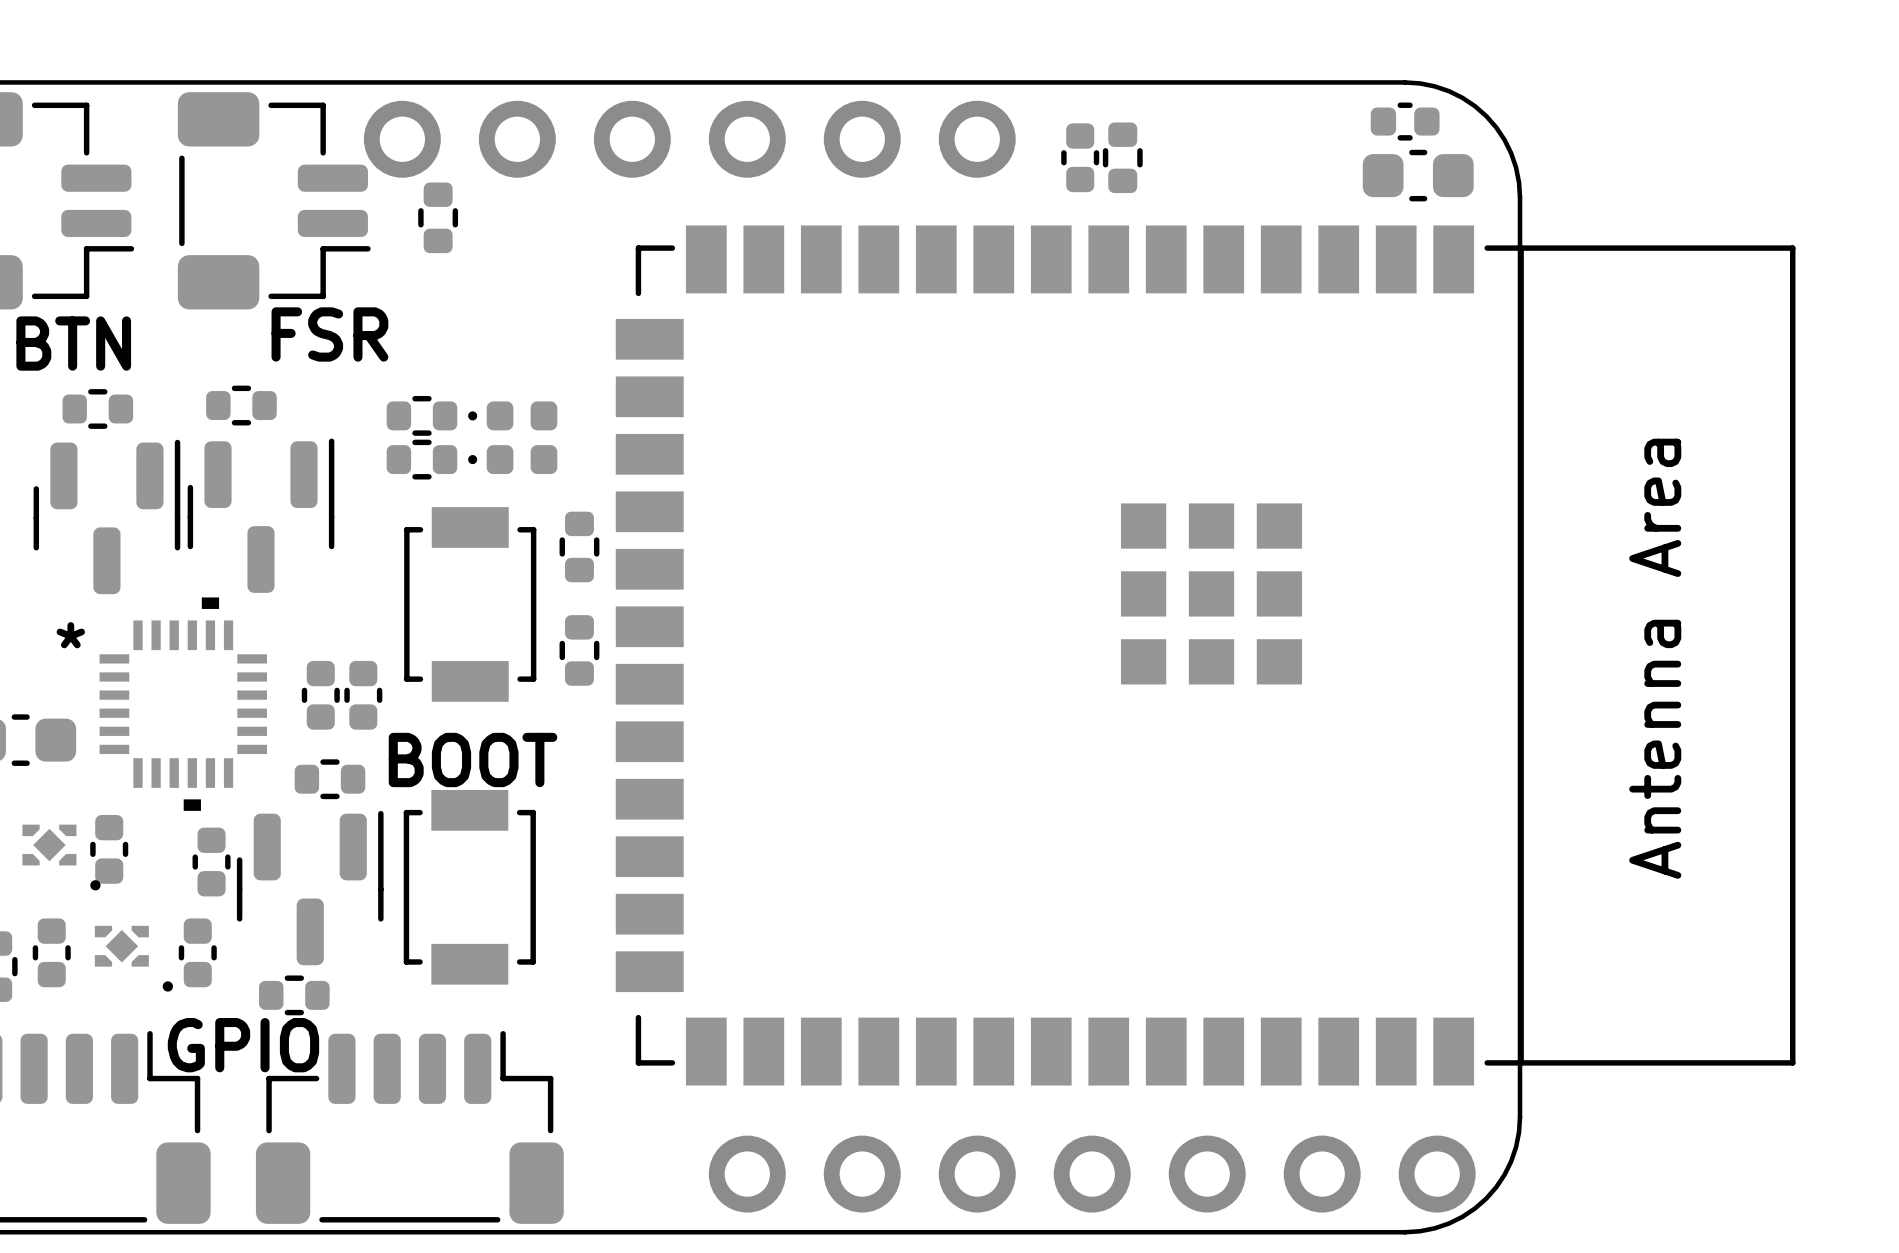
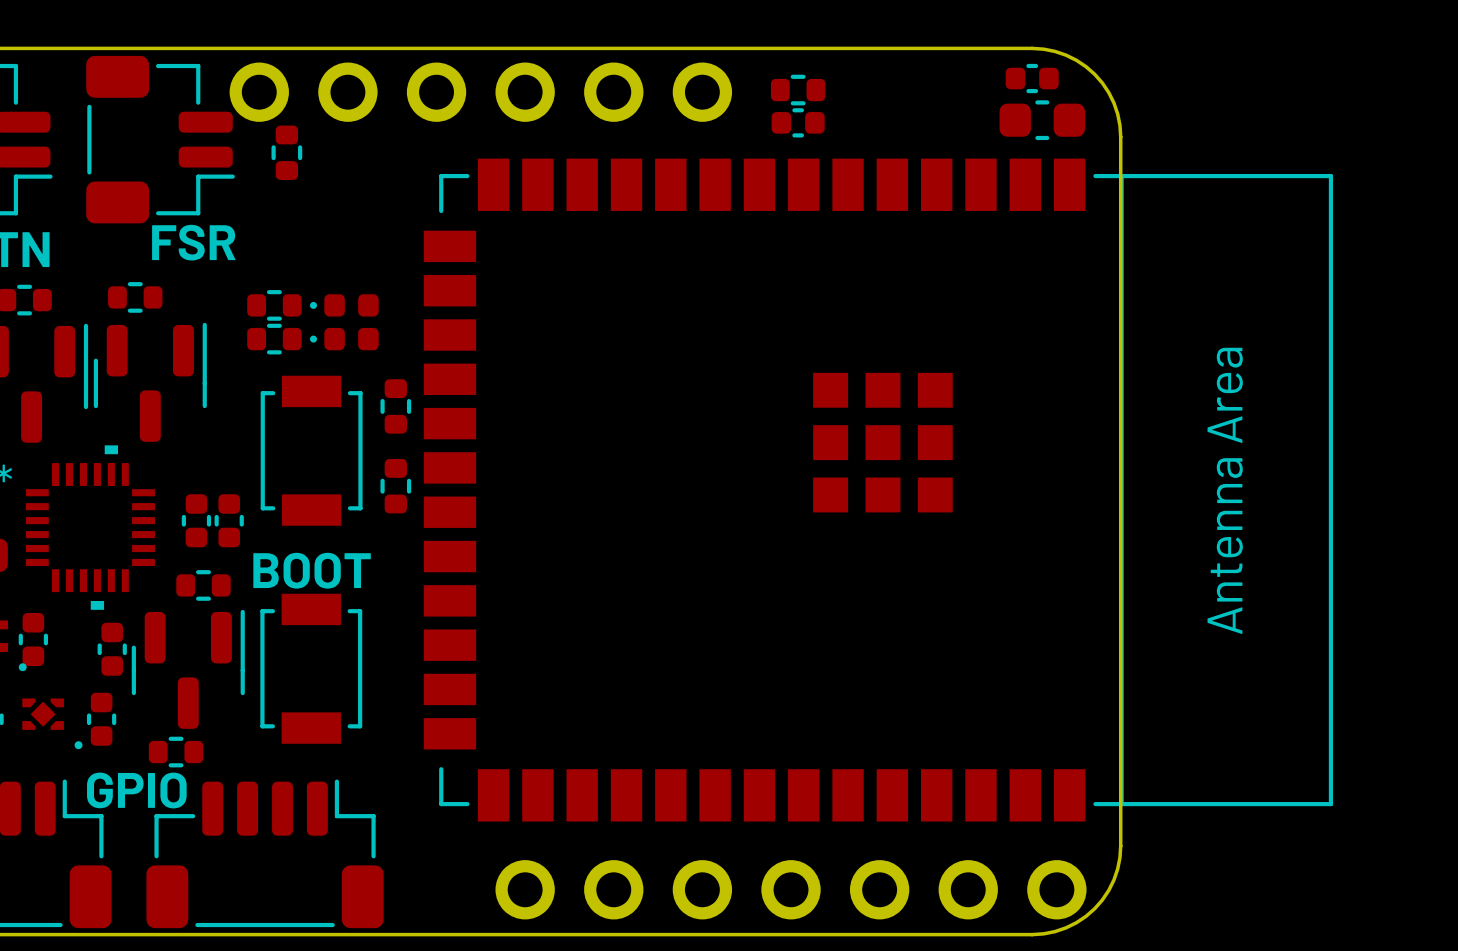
part rotation: 0° (1080, 157) -> 90° clockwise (798, 122)
part rotation: 0° (1122, 157) -> 90° clockwise (798, 90)

